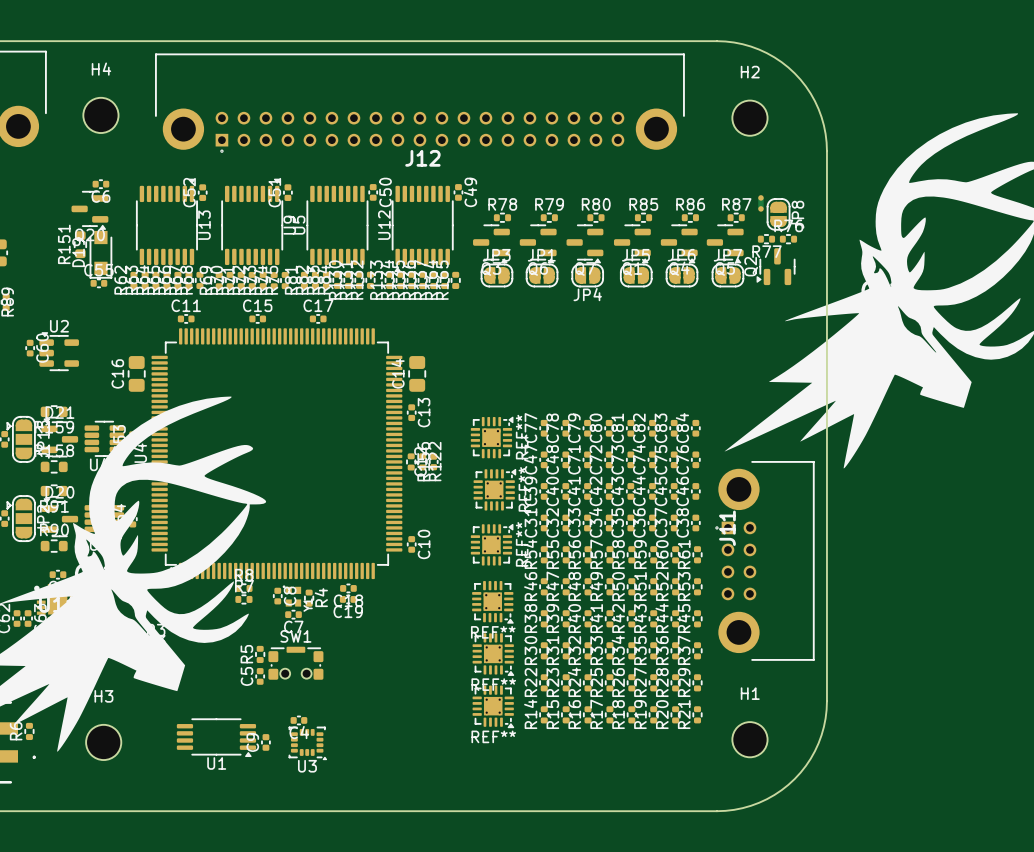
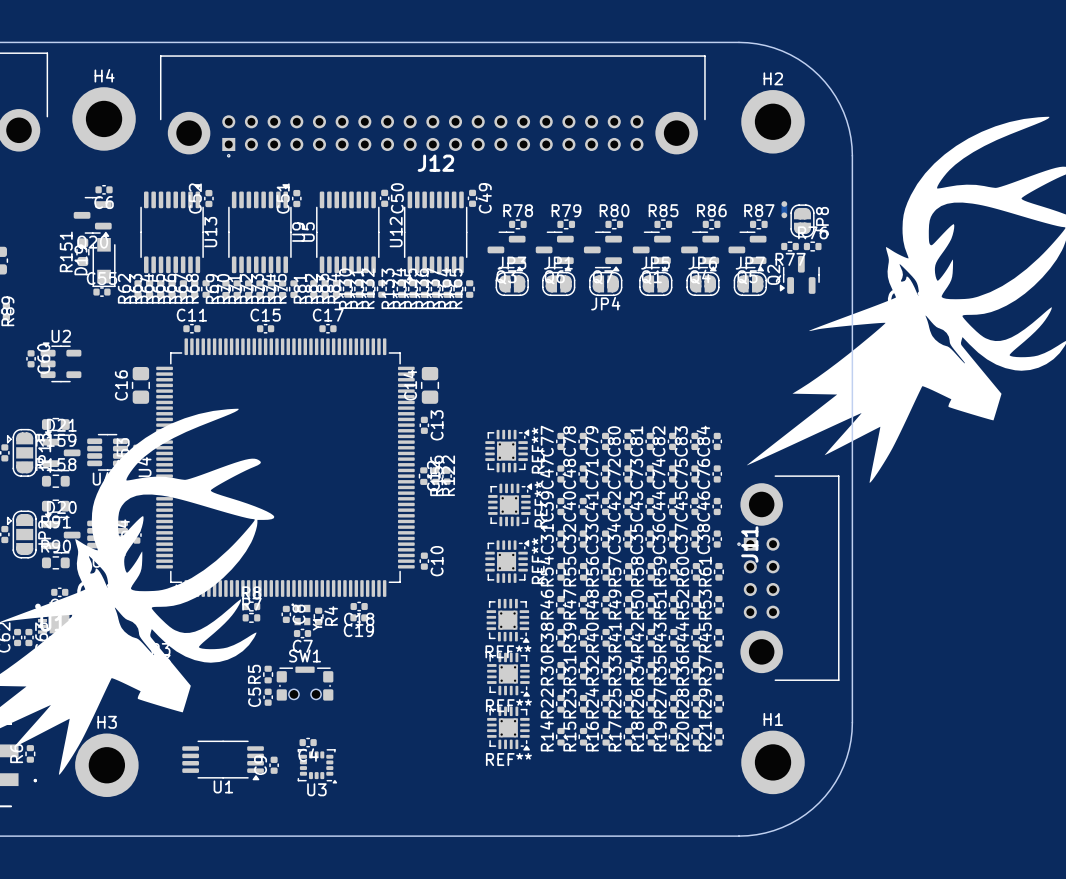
H4 footprint: [83, 97, 119, 134] -> [72, 87, 136, 151]
H2 footprint: [732, 100, 768, 136] -> [741, 90, 805, 154]
H1 footprint: [732, 722, 768, 758] -> [741, 730, 805, 795]
H3 footprint: [86, 724, 122, 761] -> [75, 733, 139, 798]

